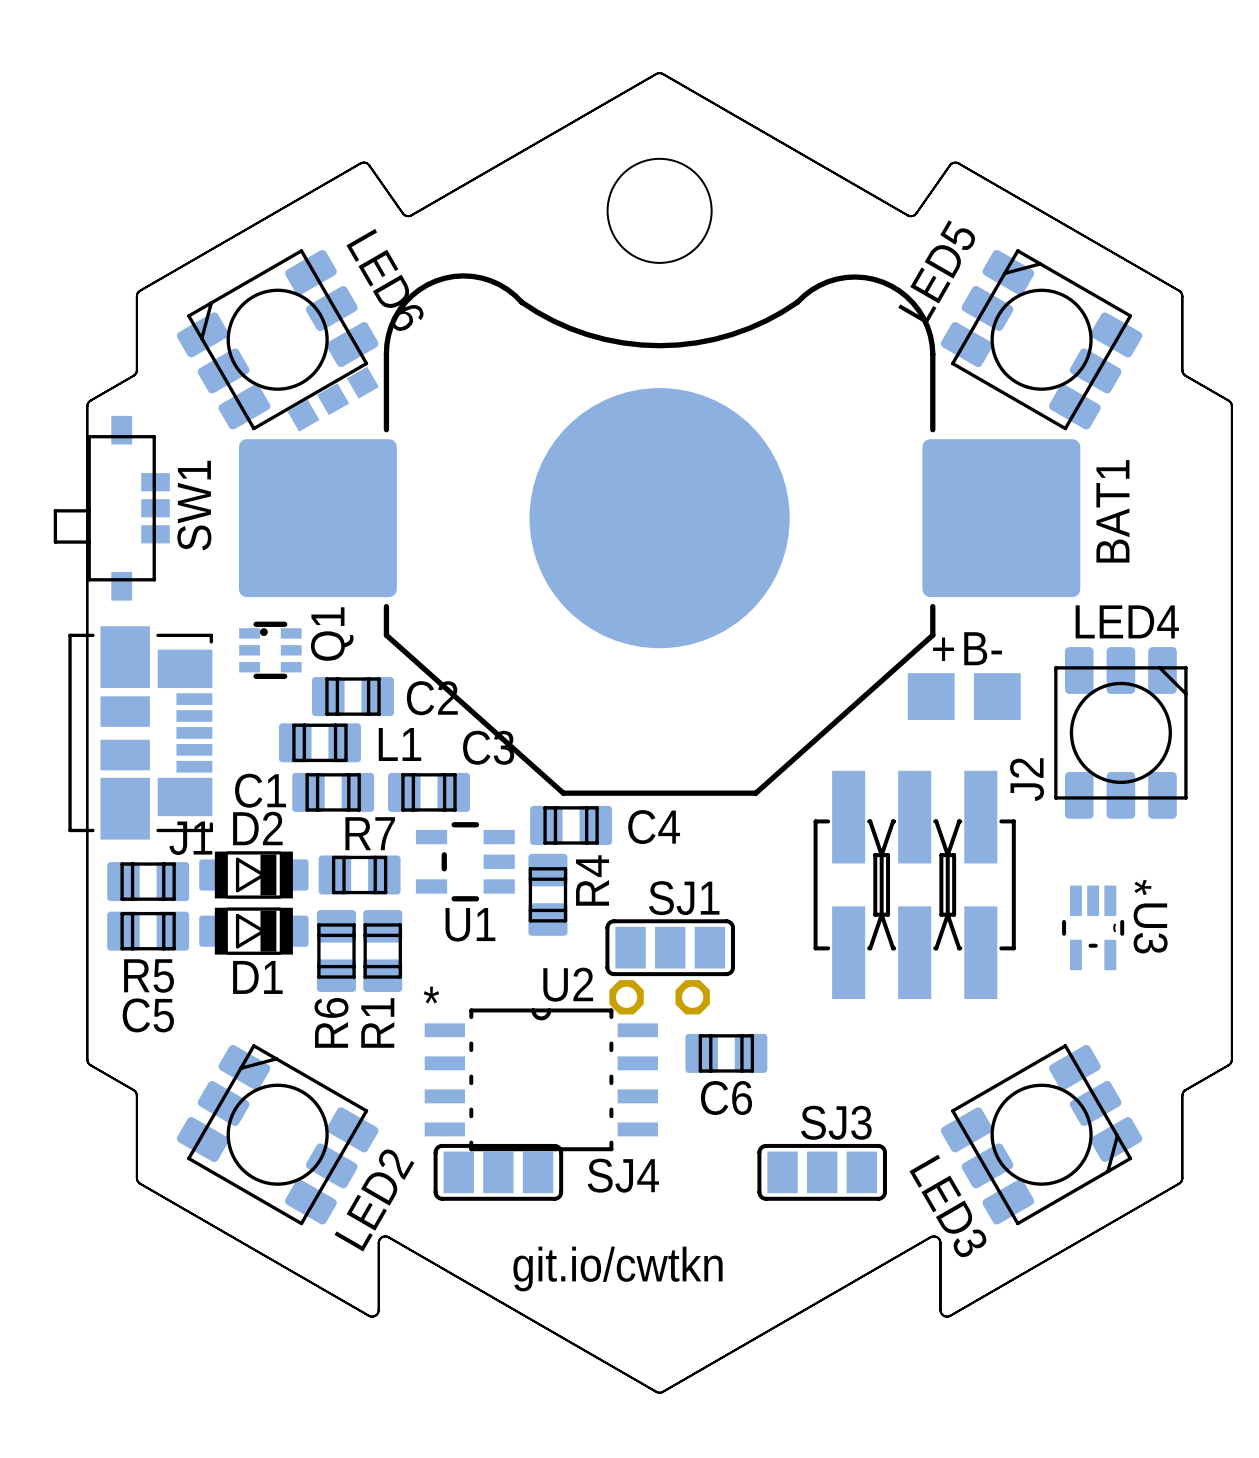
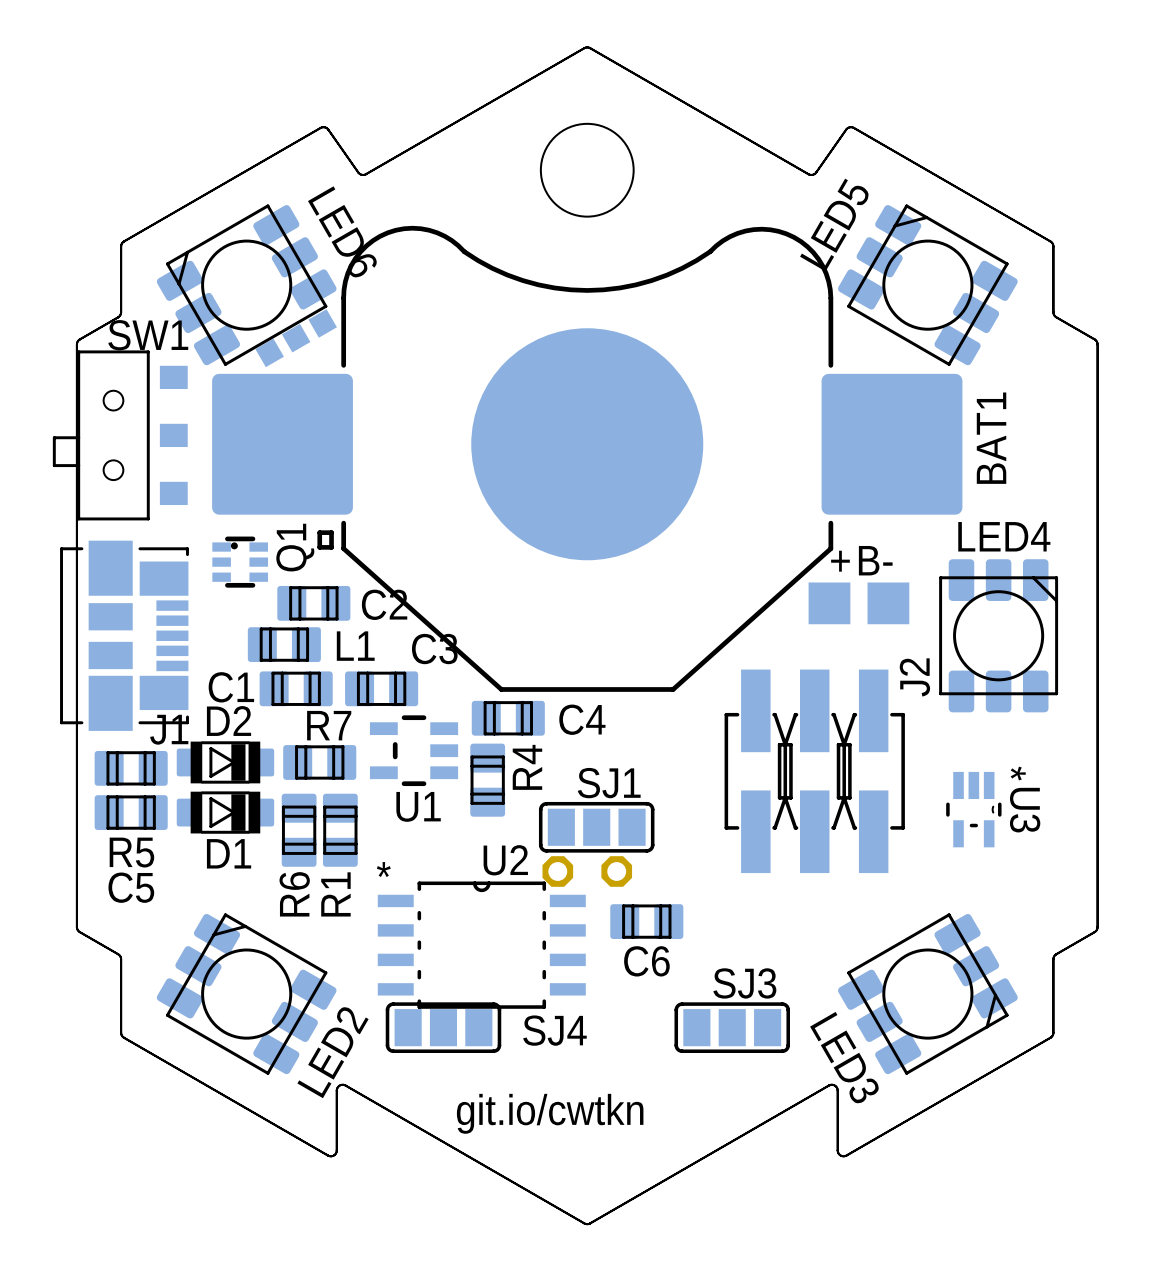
SW1 footprint: [53, 415, 170, 601] -> [52, 350, 188, 521]
SW1 name position: SW1 (194, 505) -> SW1 (148, 335)
line: none -> (331, 532) (331, 547) (319, 547) (319, 532) (331, 532)

